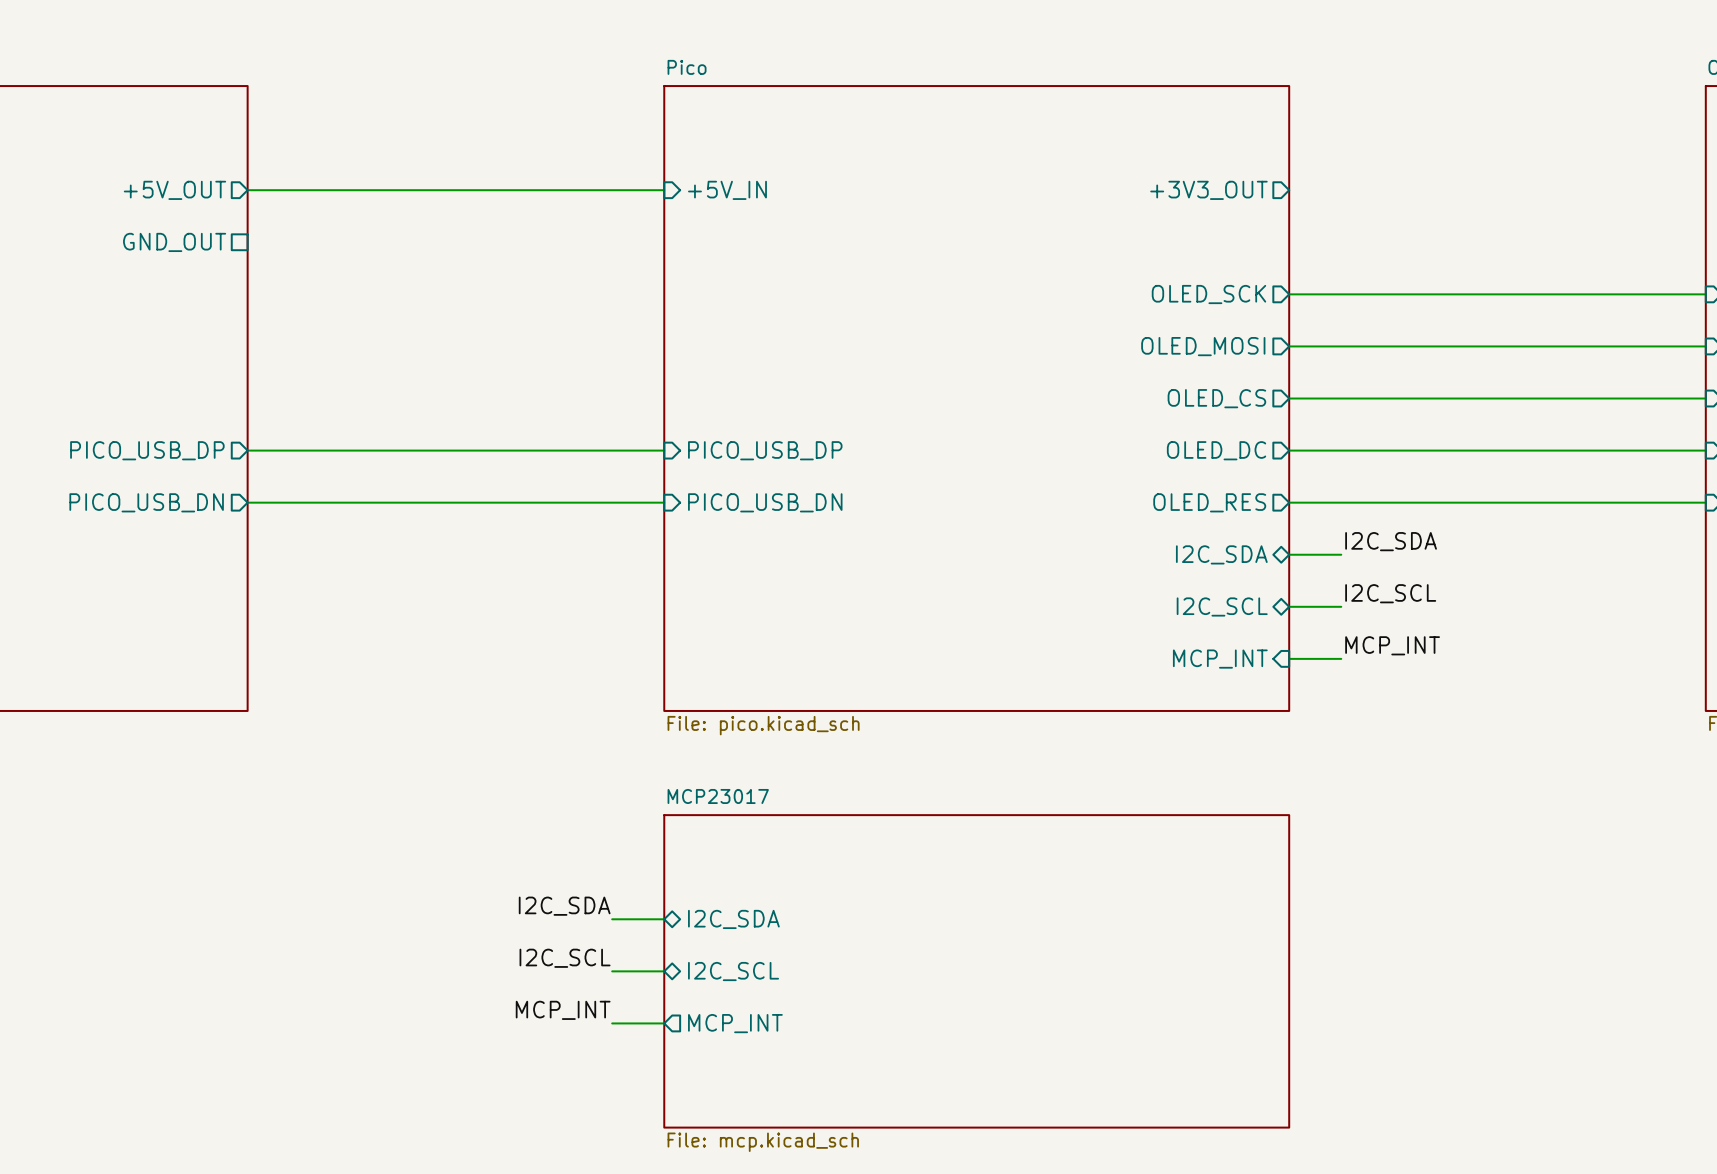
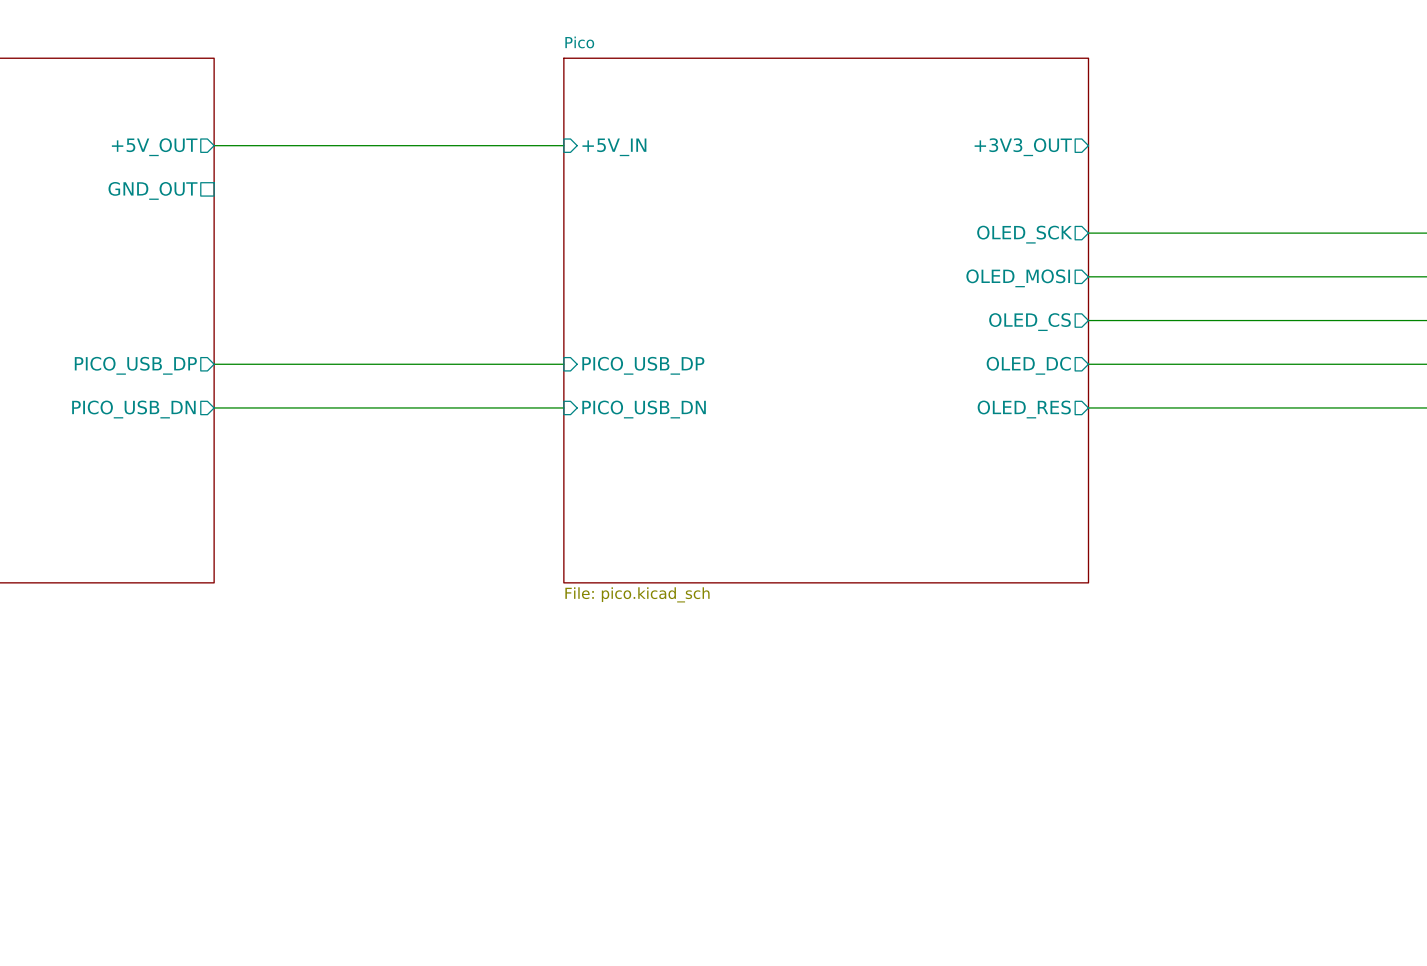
label: I2C_SDA (1391, 541) -> none
sheet pin: I2C_SDA (1221, 554) -> none
wire: (1289, 554) (1341, 554) -> none
label: I2C_SCL (1390, 593) -> none
sheet pin: I2C_SCL (1222, 606) -> none
wire: (1289, 606) (1341, 606) -> none
label: MCP_INT (1392, 645) -> none
wire: (1289, 658) (1341, 658) -> none
sheet pin: MCP_INT (1220, 659) -> none
label: I2C_SDA (564, 906) -> none
wire: (612, 919) (664, 919) -> none
sheet pin: I2C_SDA (733, 919) -> none
label: I2C_SCL (565, 958) -> none
wire: (612, 971) (664, 971) -> none
sheet pin: I2C_SCL (733, 971) -> none
sheet MCP23017: File: mcp.kicad_sch (976, 971) -> none
label: MCP_INT (563, 1010) -> none
wire: (612, 1023) (664, 1023) -> none
sheet pin: MCP_INT (735, 1023) -> none

